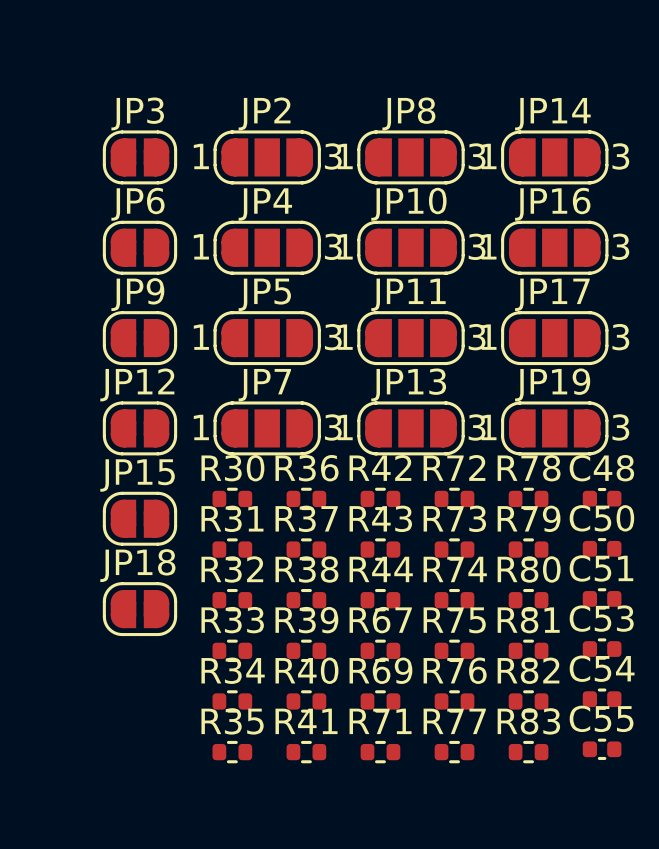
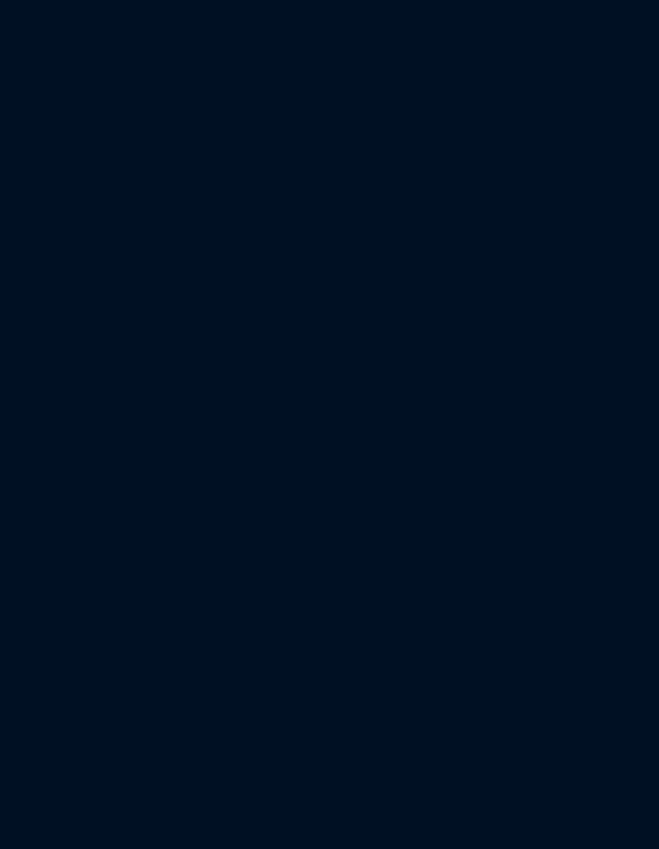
JP3: (139, 157) -> none
JP2: (267, 157) -> none
JP8: (410, 157) -> none
JP14: (554, 157) -> none
JP6: (139, 247) -> none
JP4: (267, 247) -> none
JP10: (410, 247) -> none
JP16: (554, 247) -> none
JP9: (139, 338) -> none
JP5: (267, 338) -> none
JP11: (410, 338) -> none
JP17: (554, 338) -> none
JP12: (139, 428) -> none
JP7: (267, 428) -> none
JP13: (410, 428) -> none
JP19: (554, 428) -> none
R30: (232, 498) -> none
R36: (306, 498) -> none
R42: (380, 498) -> none
R72: (454, 498) -> none
R78: (528, 498) -> none
C48: (602, 498) -> none
JP15: (139, 518) -> none
C50: (602, 548) -> none
R31: (232, 549) -> none
R37: (306, 549) -> none
R43: (380, 549) -> none
R73: (454, 549) -> none
R79: (528, 549) -> none
C51: (602, 598) -> none
R32: (232, 600) -> none
R38: (306, 600) -> none
R44: (380, 600) -> none
R74: (454, 600) -> none
R80: (528, 600) -> none
JP18: (139, 609) -> none
C53: (602, 649) -> none
R33: (232, 650) -> none
R39: (306, 650) -> none
R67: (380, 650) -> none
R75: (454, 650) -> none
R81: (528, 650) -> none
C54: (602, 699) -> none
R34: (232, 701) -> none
R40: (306, 701) -> none
R69: (380, 701) -> none
R76: (454, 701) -> none
R82: (528, 701) -> none
C55: (602, 749) -> none
R35: (232, 752) -> none
R41: (306, 752) -> none
R71: (380, 752) -> none
R77: (454, 752) -> none
R83: (528, 752) -> none

